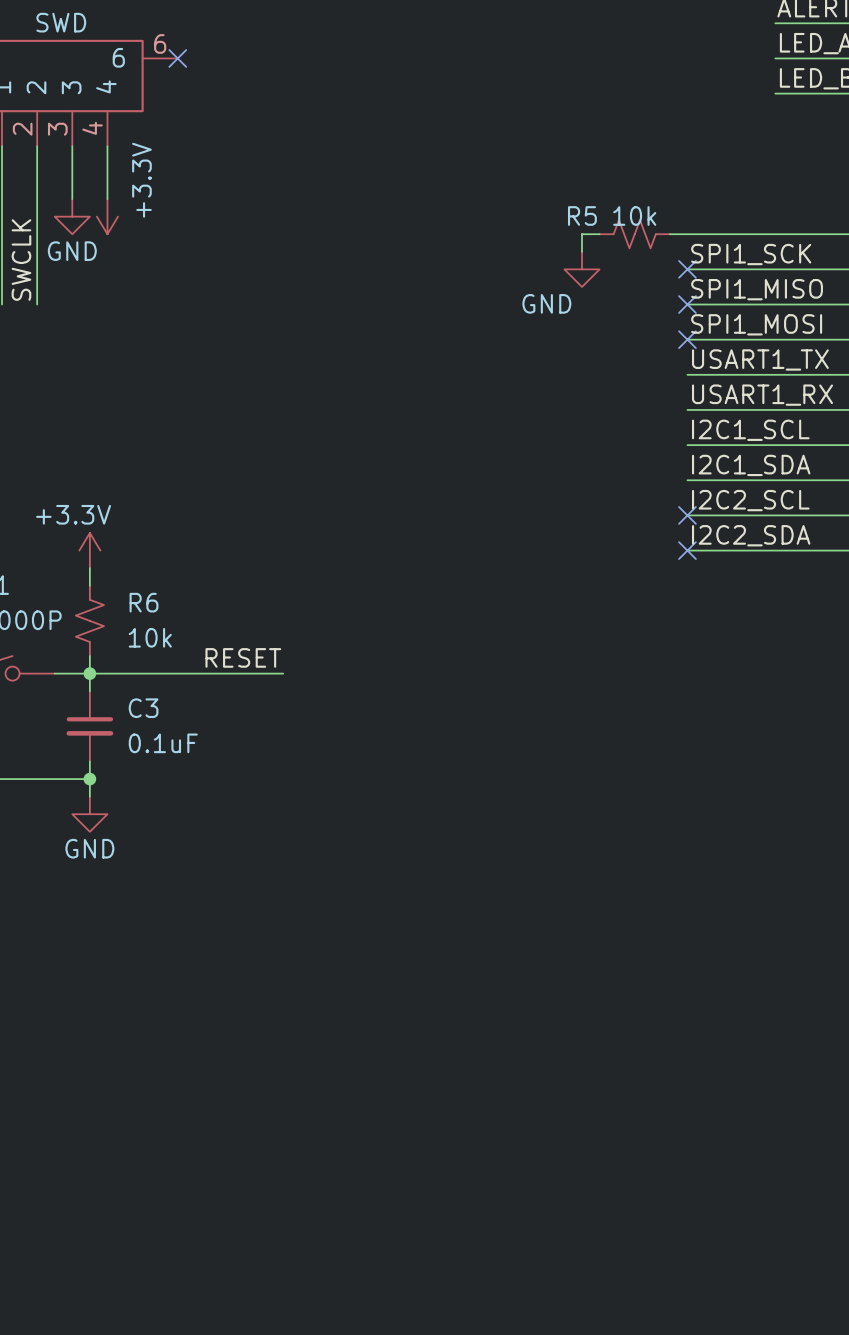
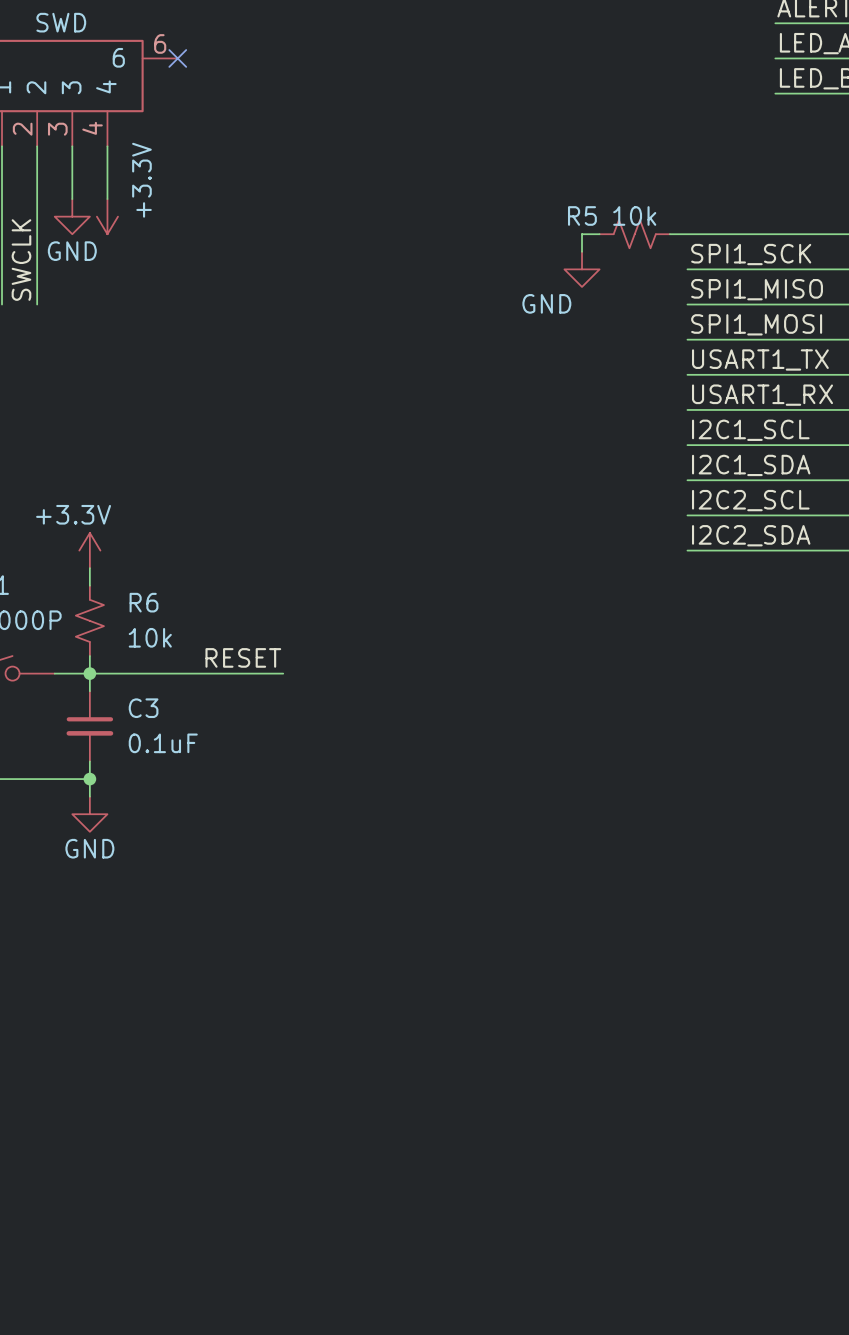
no-connect mark: (687, 269) -> none
no-connect mark: (687, 304) -> none
no-connect mark: (687, 339) -> none
no-connect mark: (687, 515) -> none
no-connect mark: (687, 550) -> none

